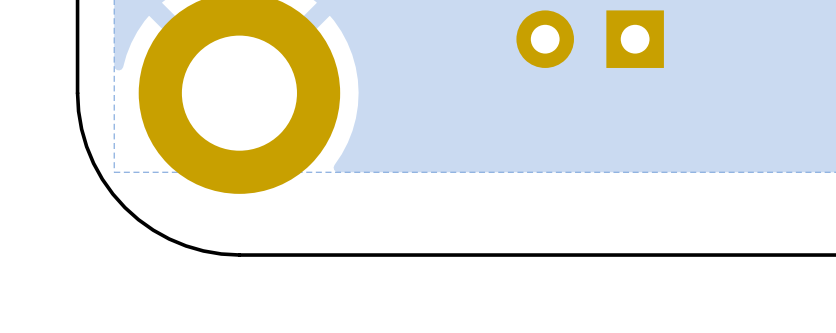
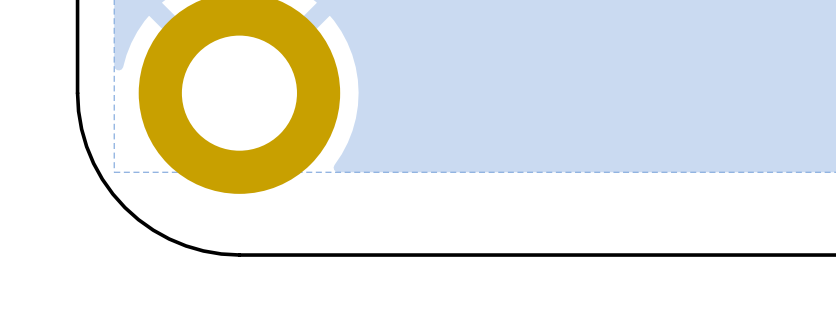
part: (590, 39) -> none

